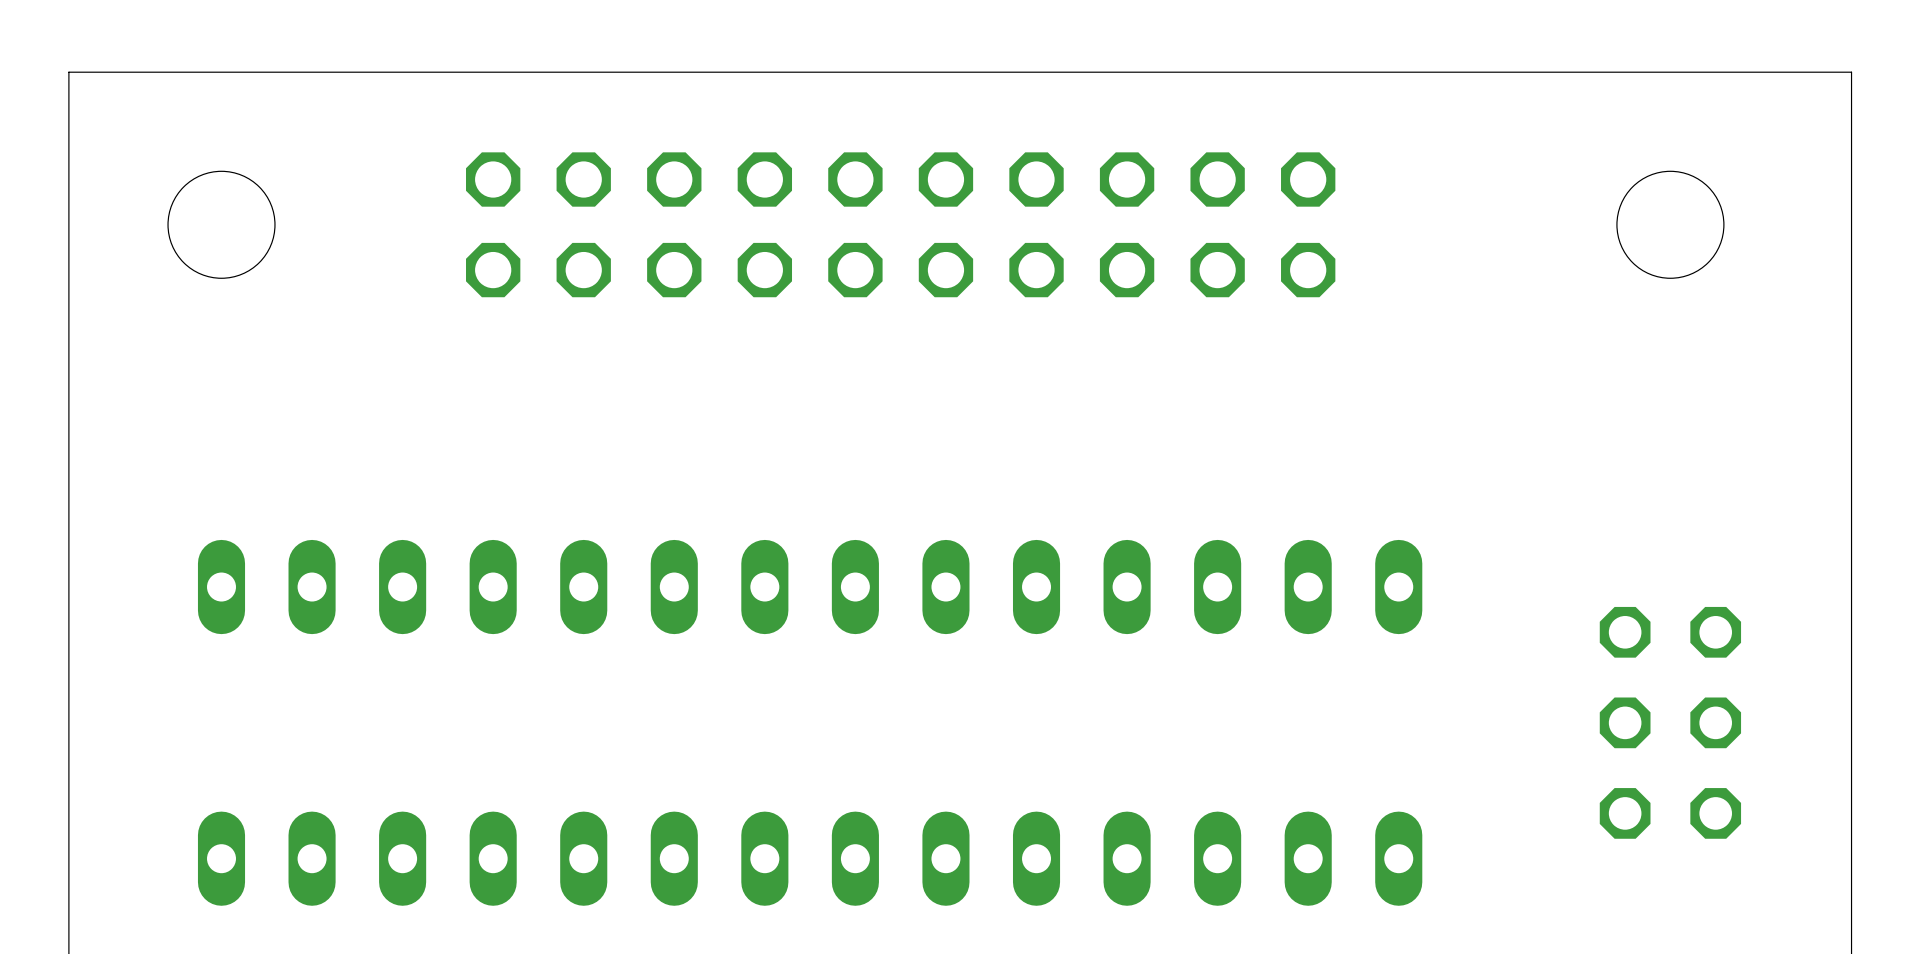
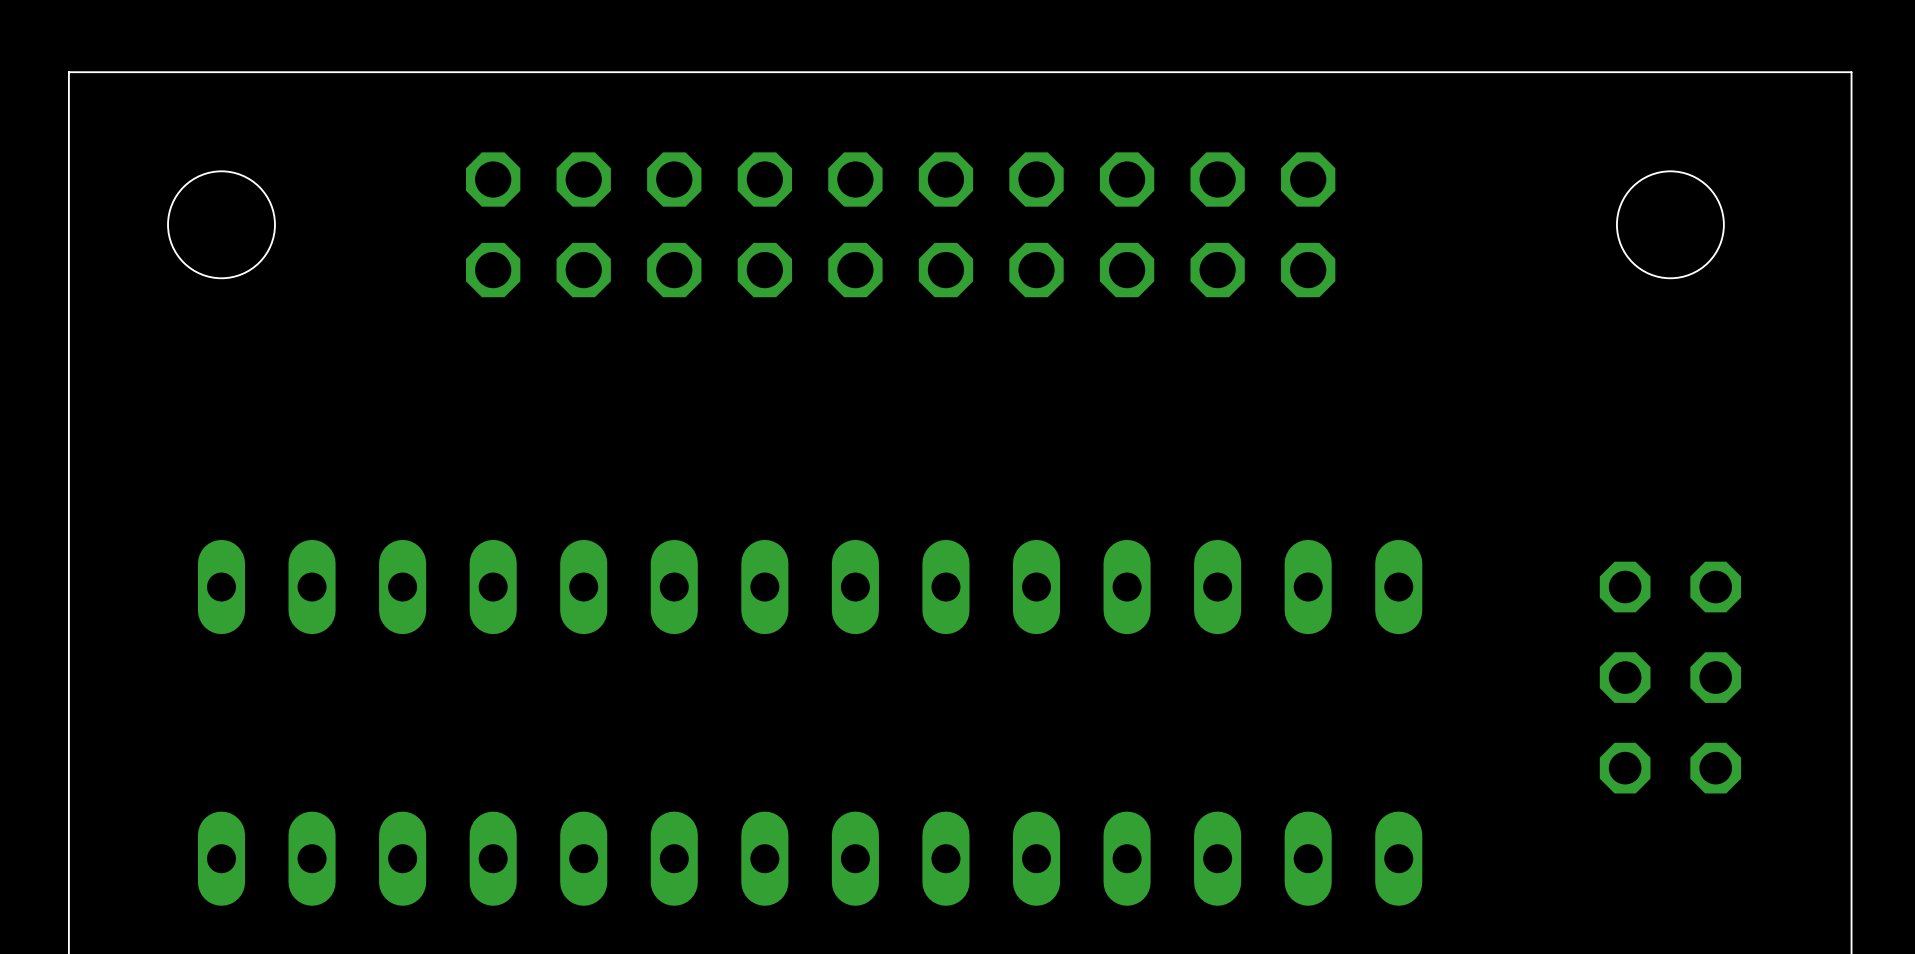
part position: (1670, 722) -> (1670, 677)

